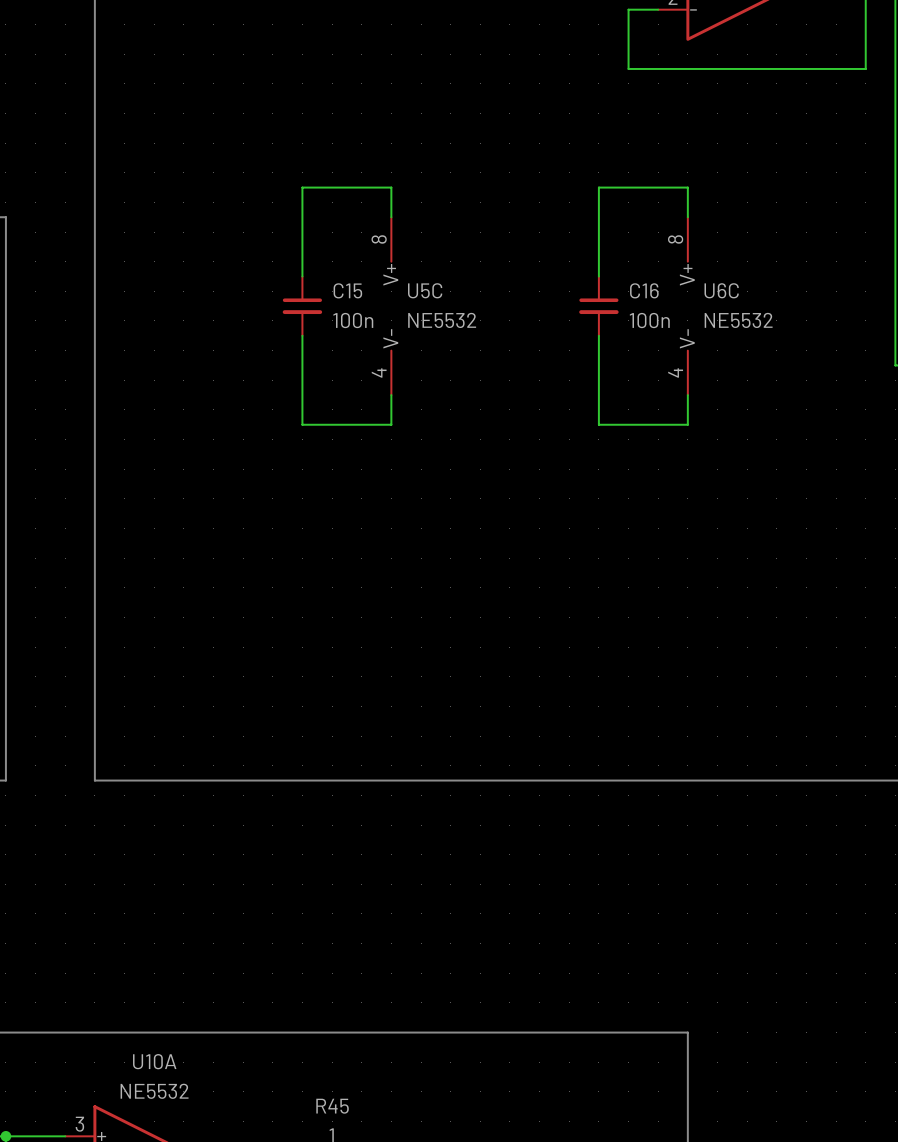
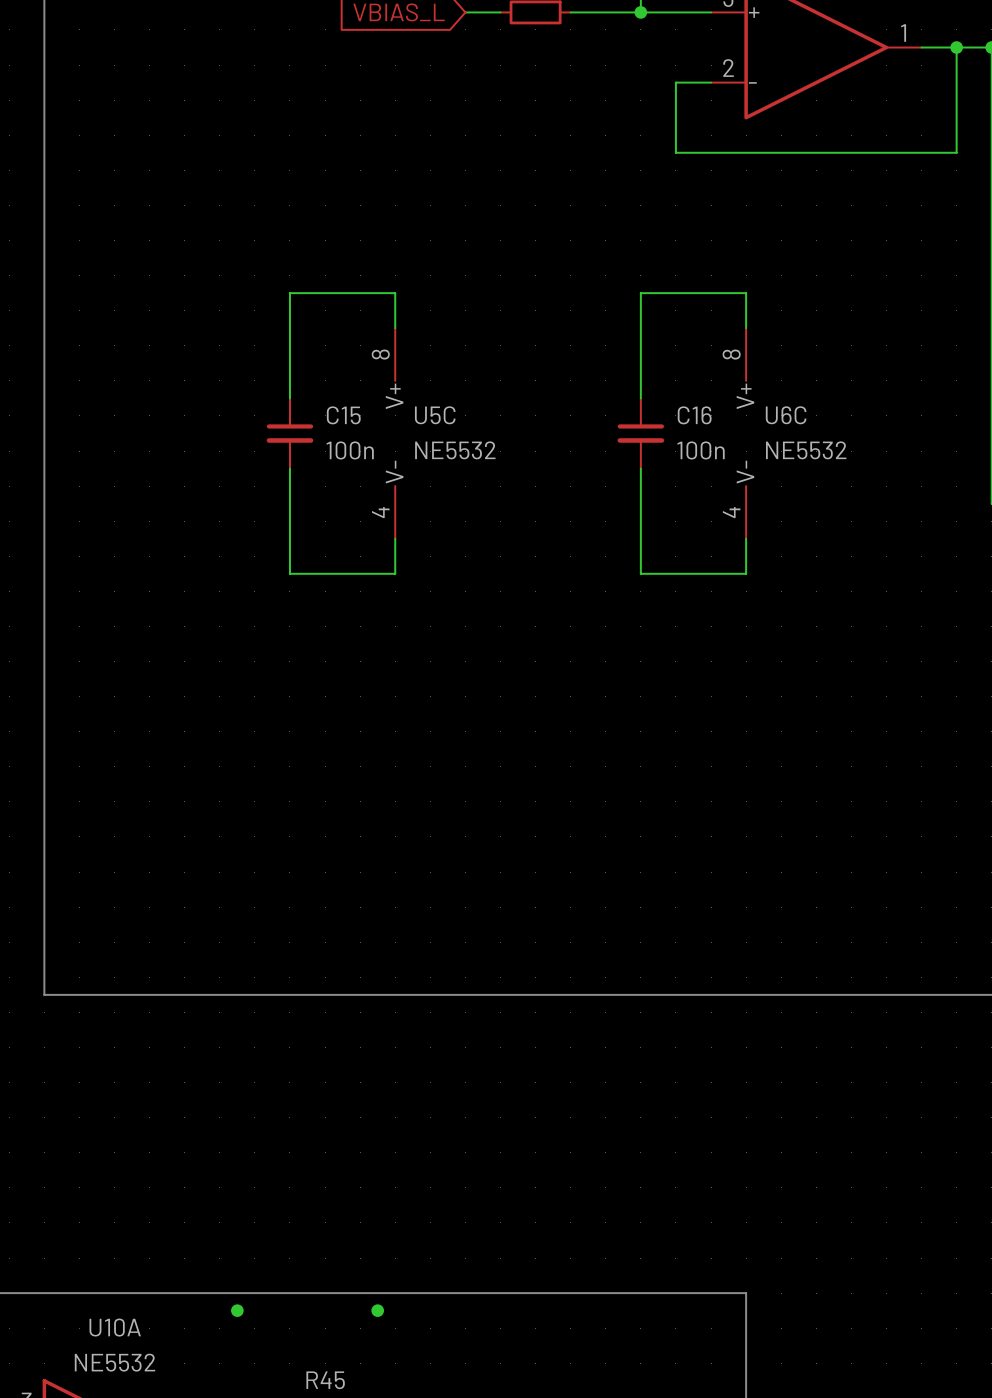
junction: none -> (237, 1310)
junction: none -> (377, 1310)

